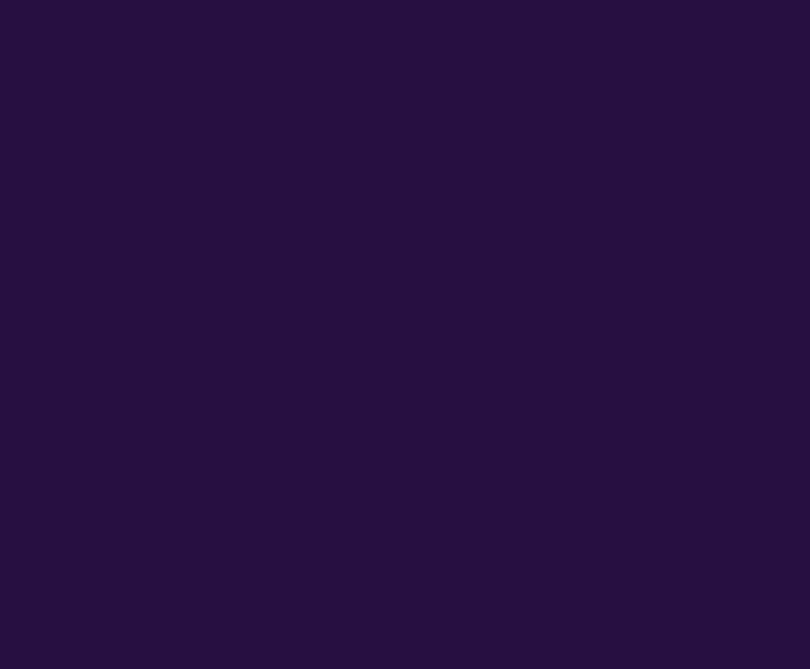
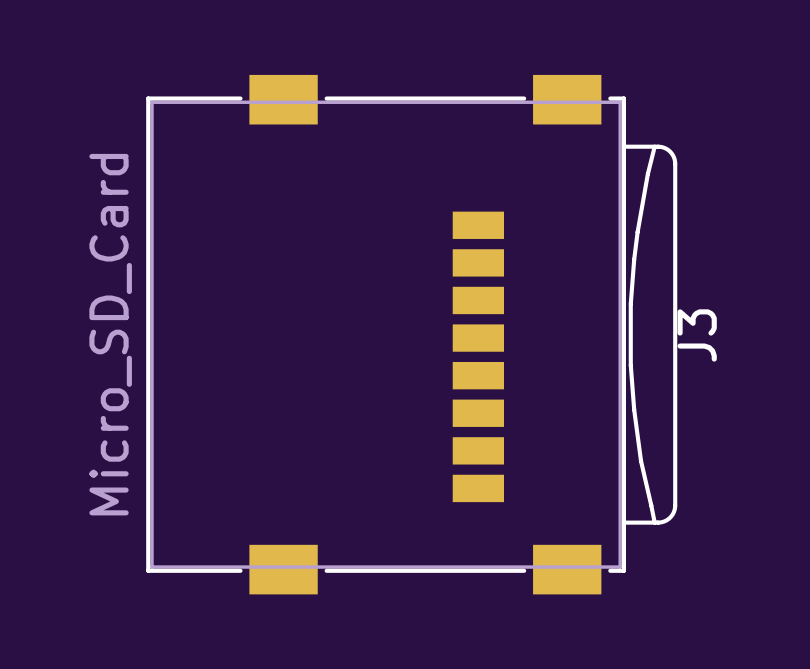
J3: none -> Micro_SD_Card (411, 334)

